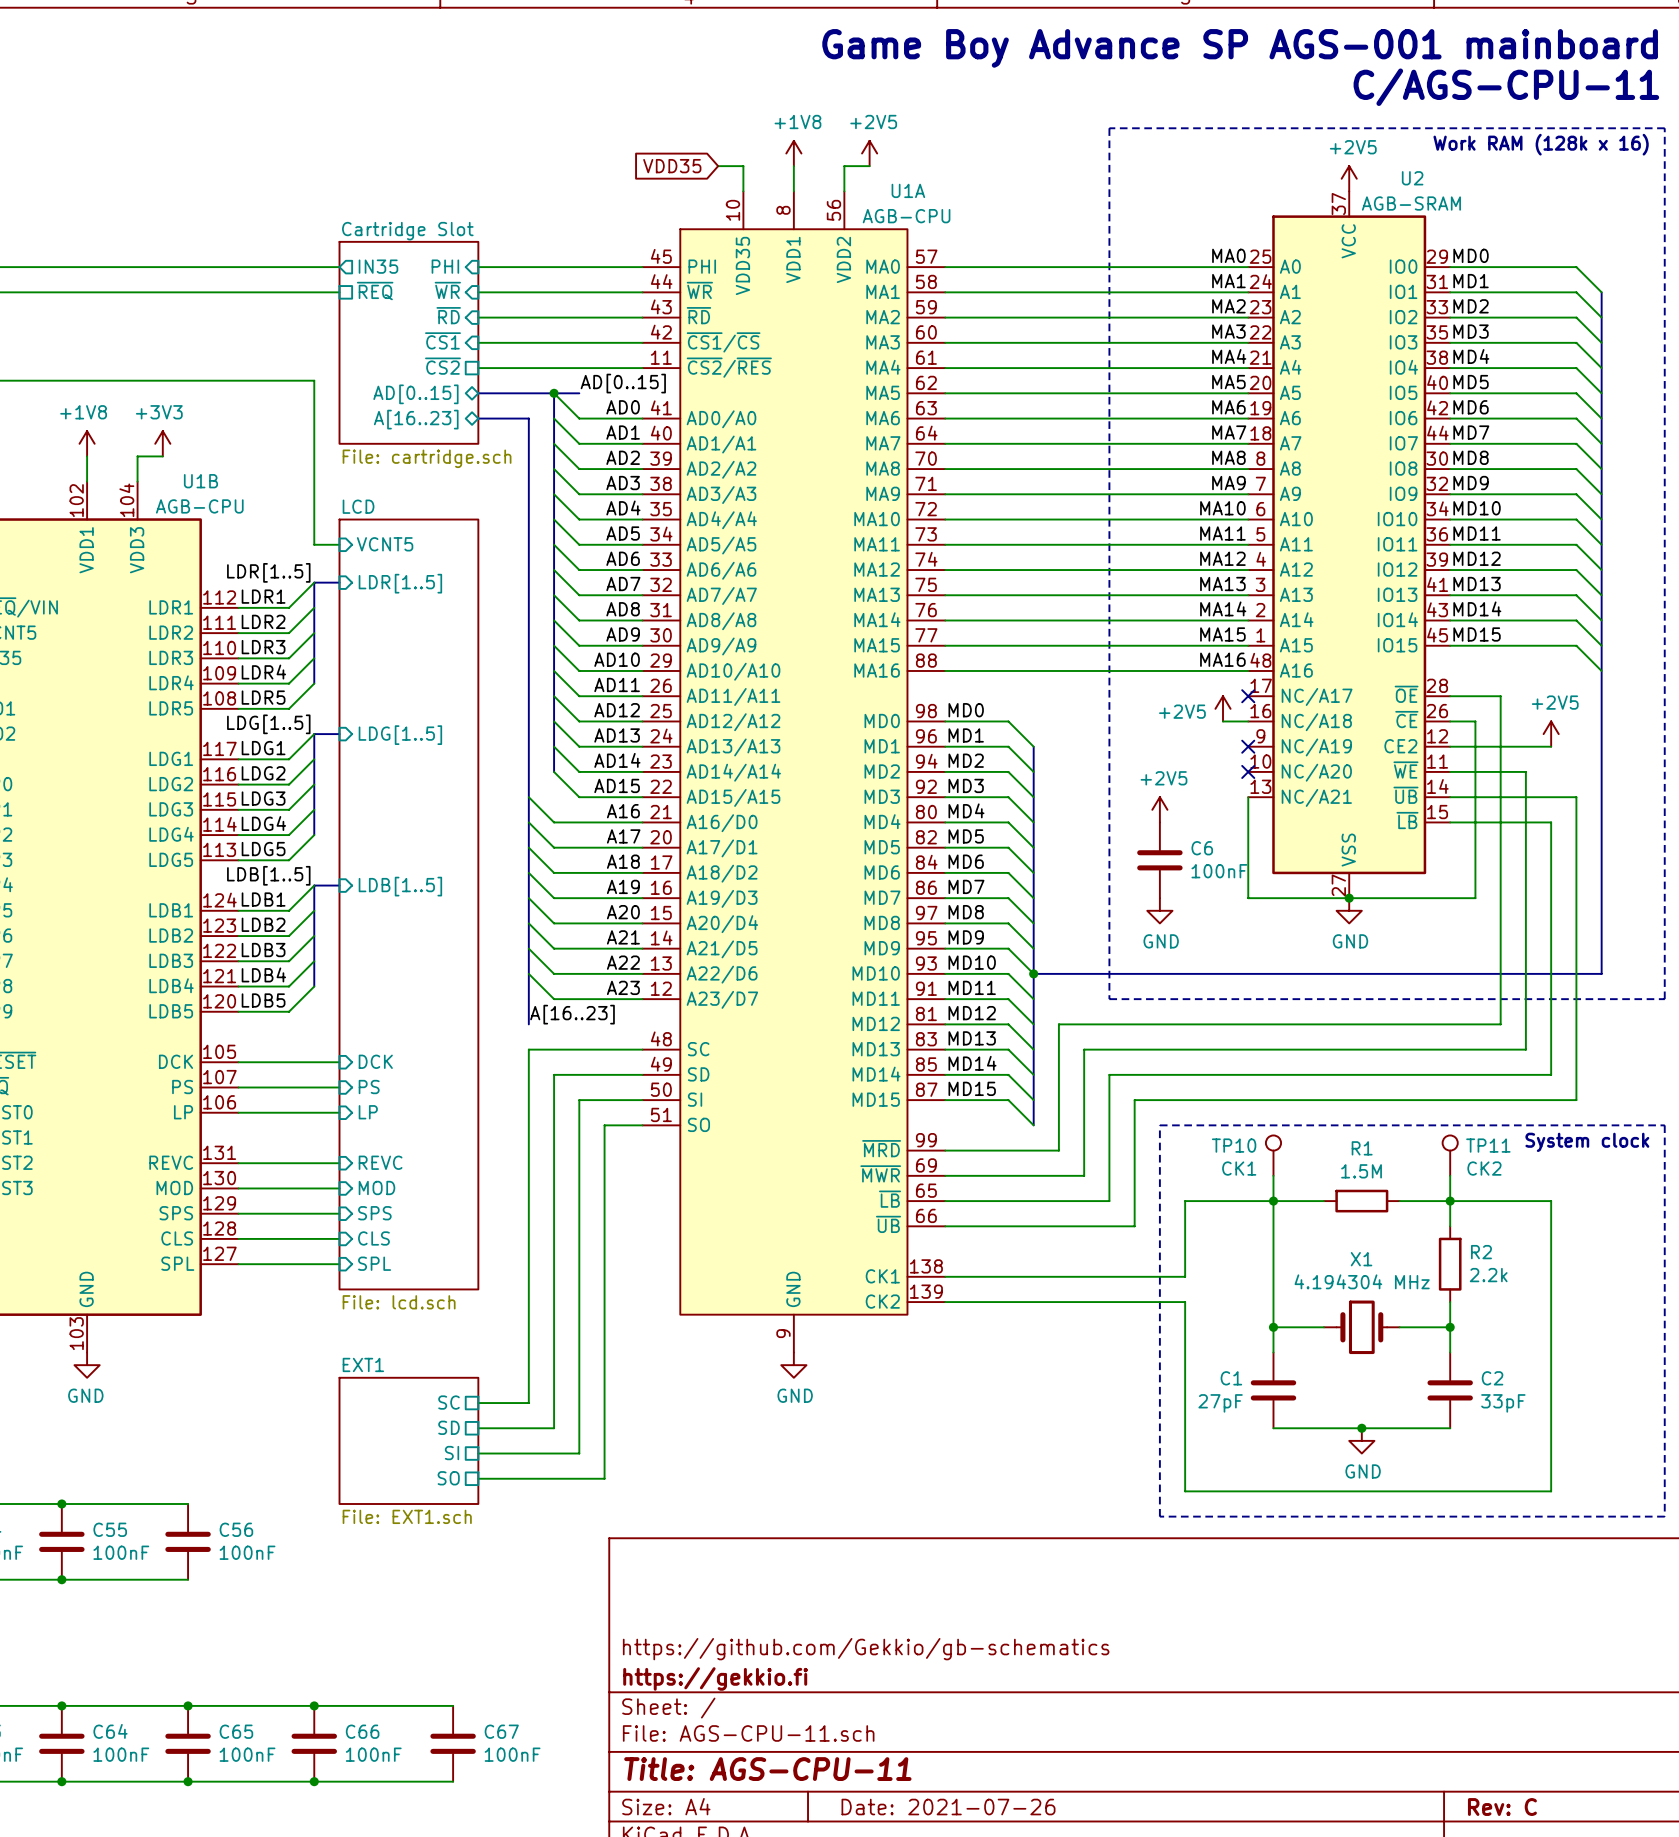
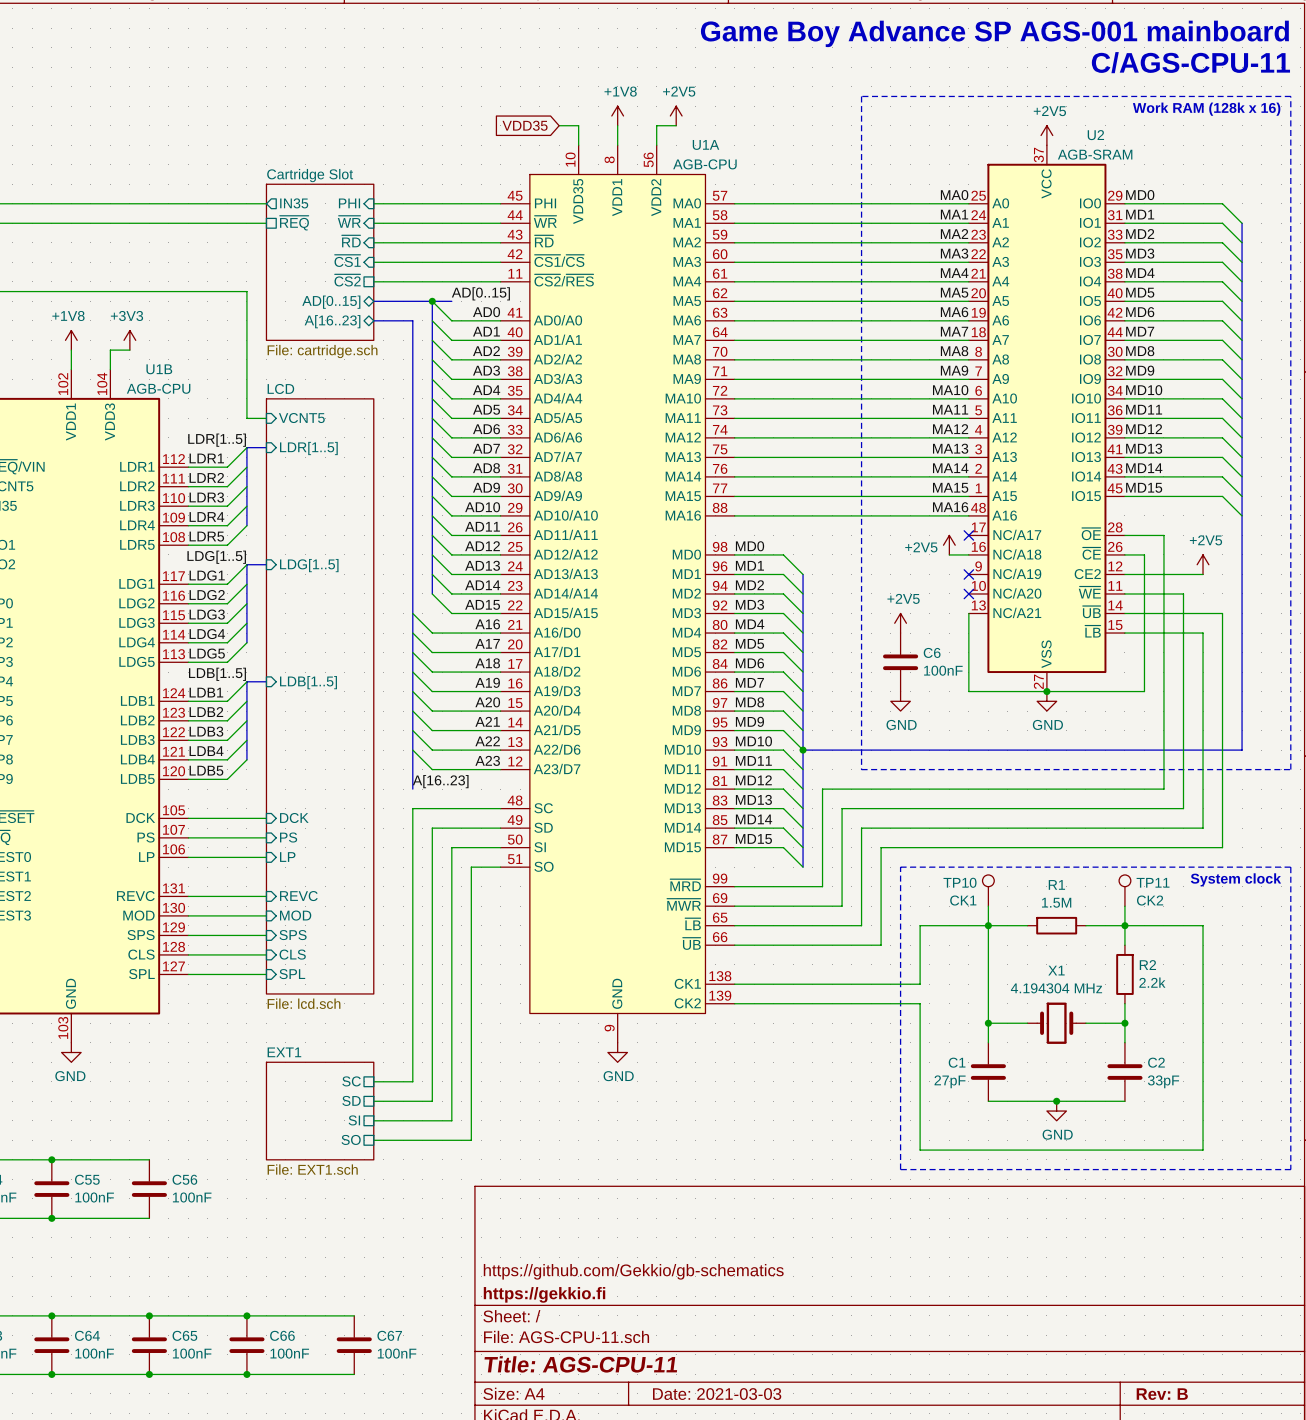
title block: Date: 2021-07-26 (948, 1807) -> Date: 2021-03-03 (717, 1394)
title block: Rev: C (1502, 1807) -> Rev: B (1162, 1394)

